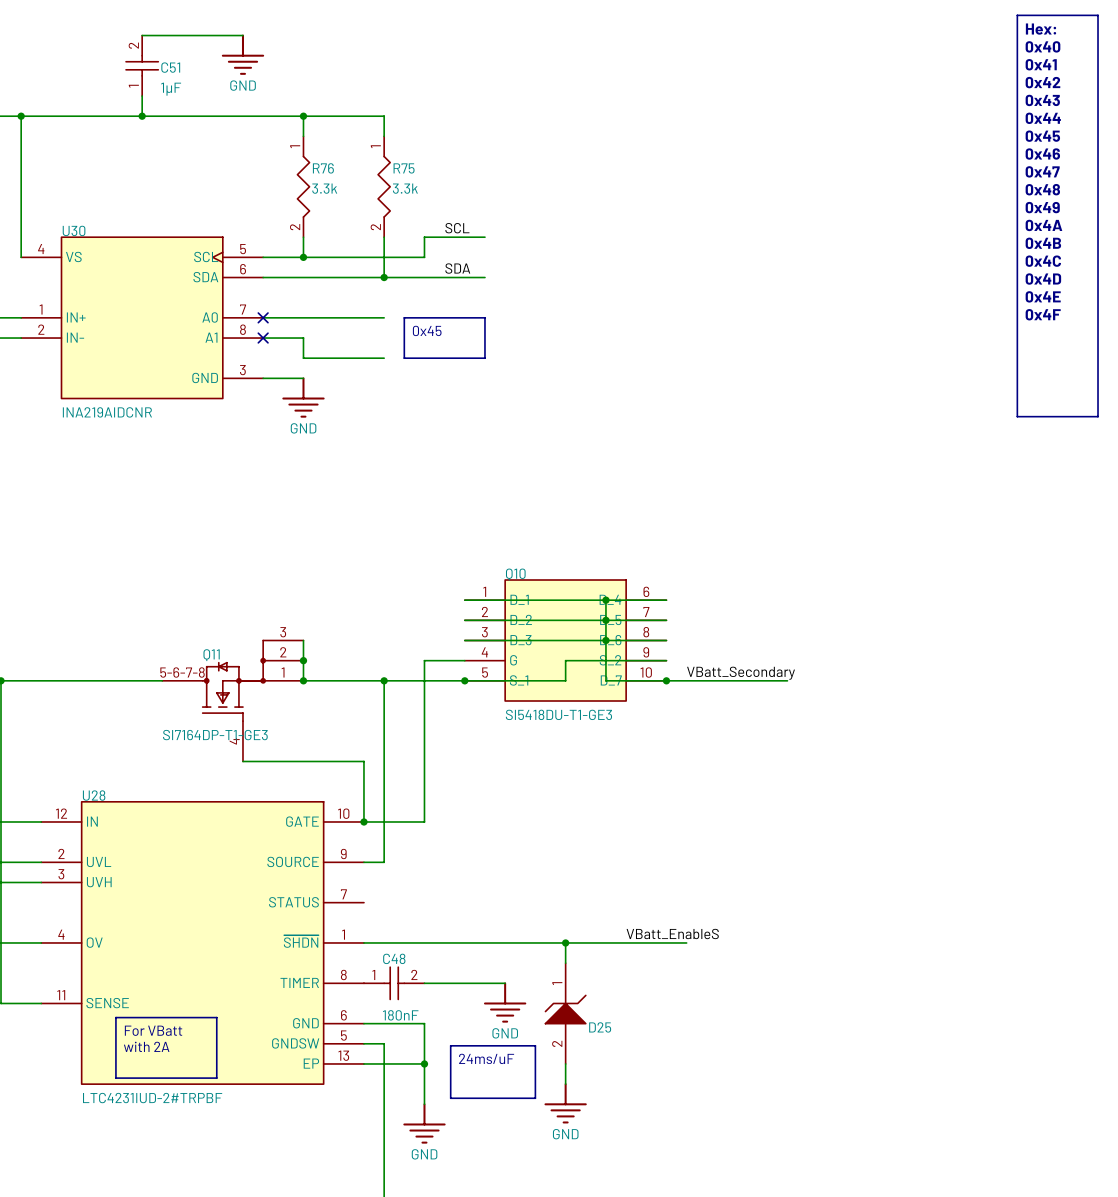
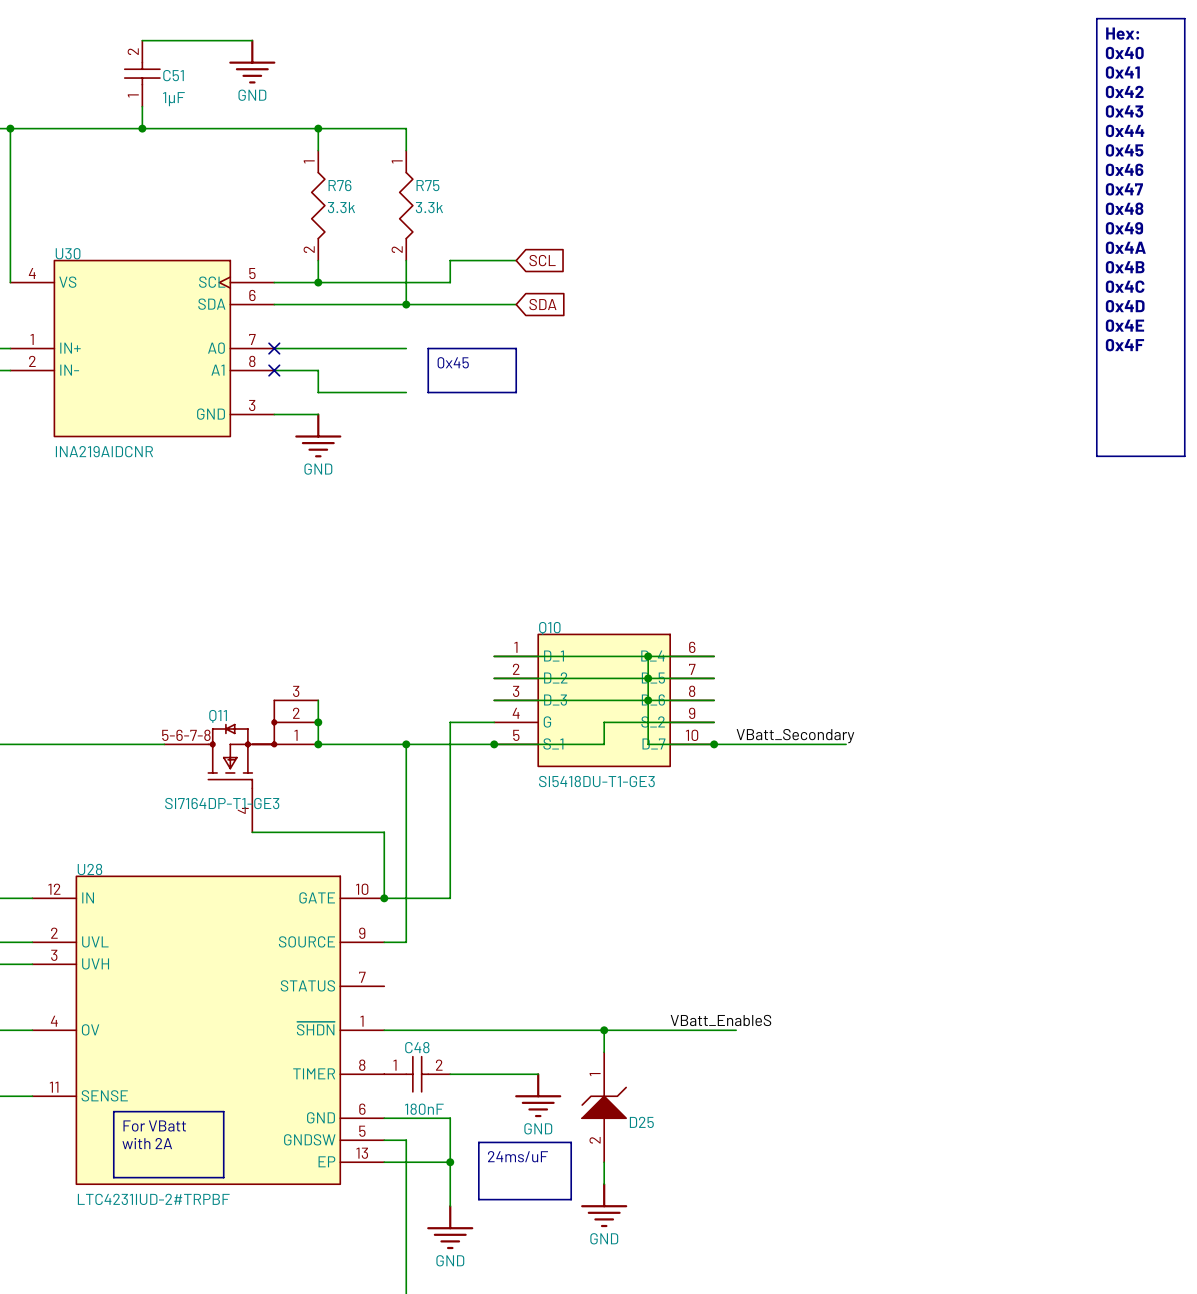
label: SCL (457, 228) -> none
global label: none -> SCL (542, 260)
label: SDA (457, 268) -> none
global label: none -> SDA (542, 304)

